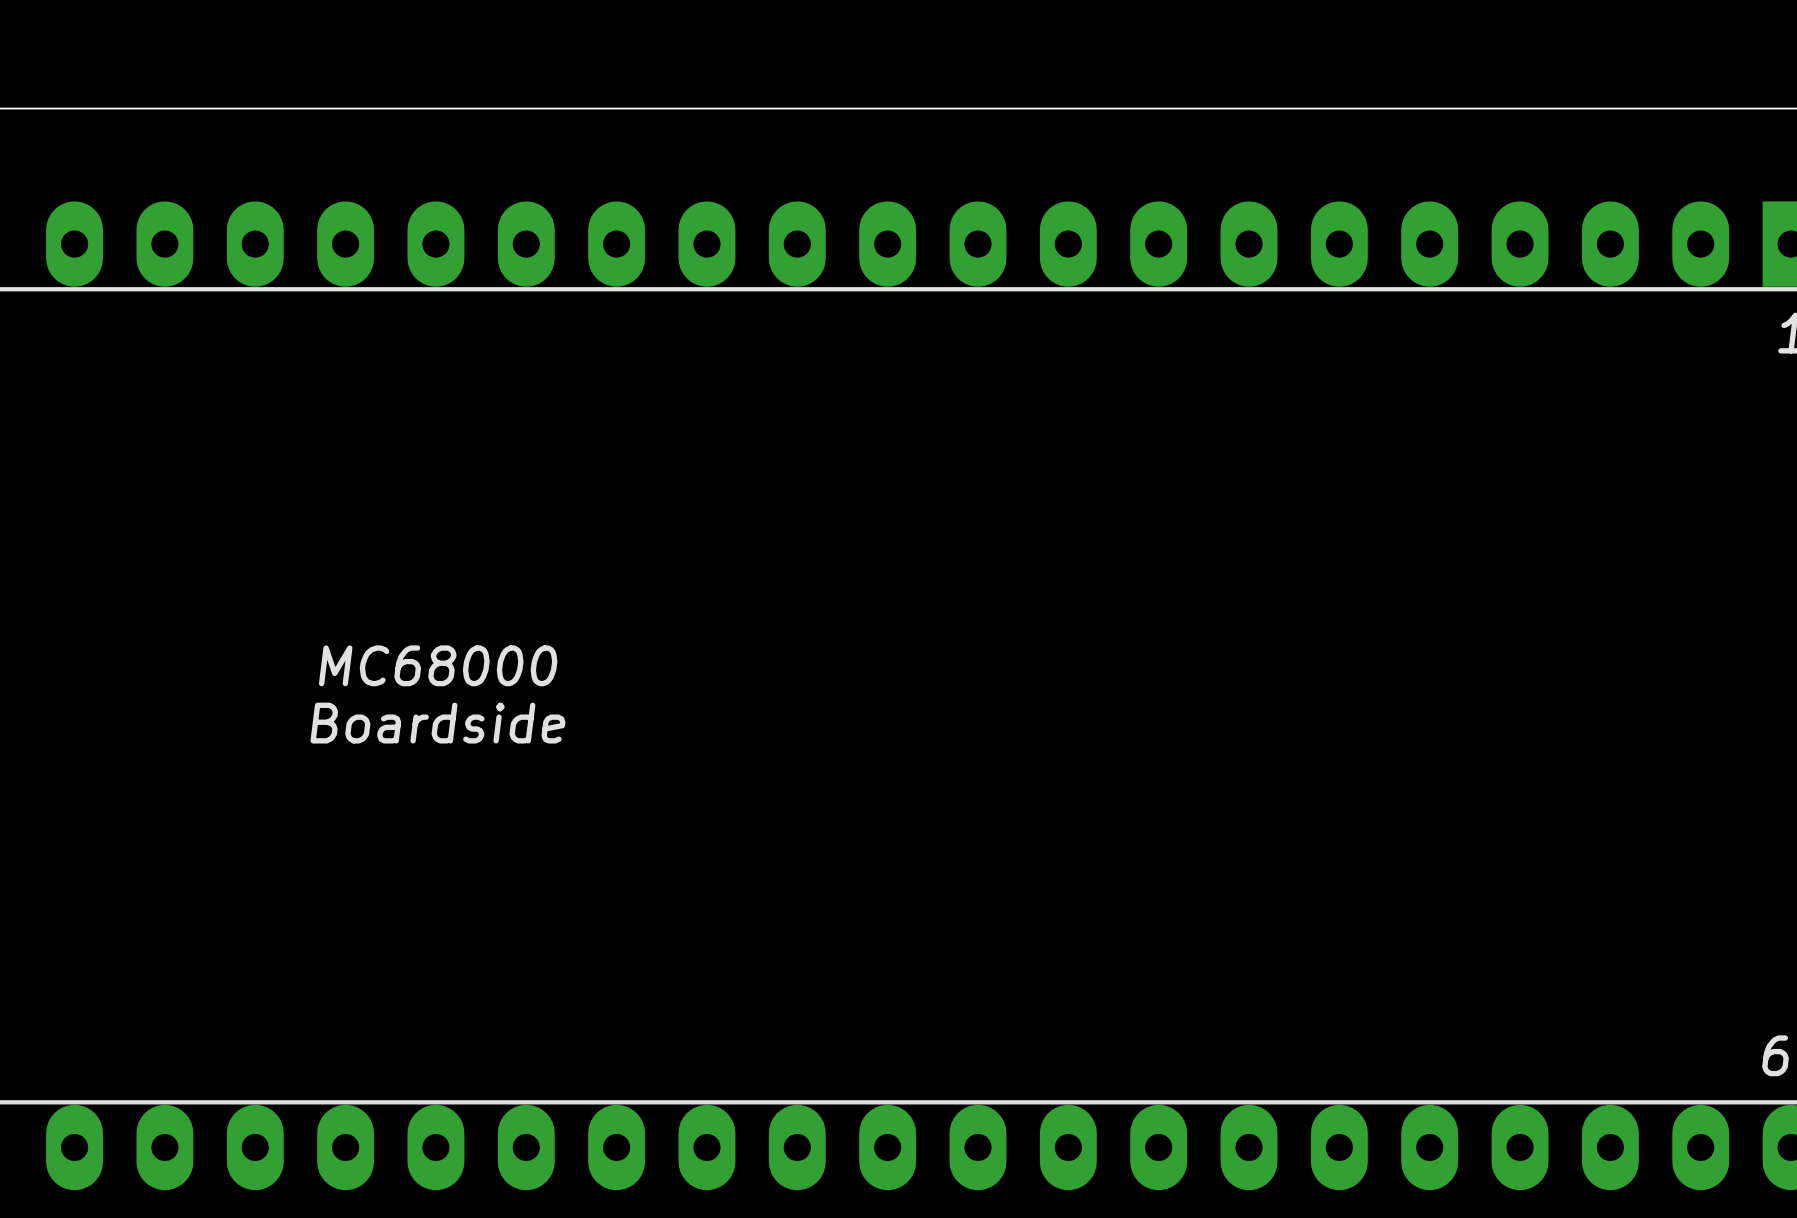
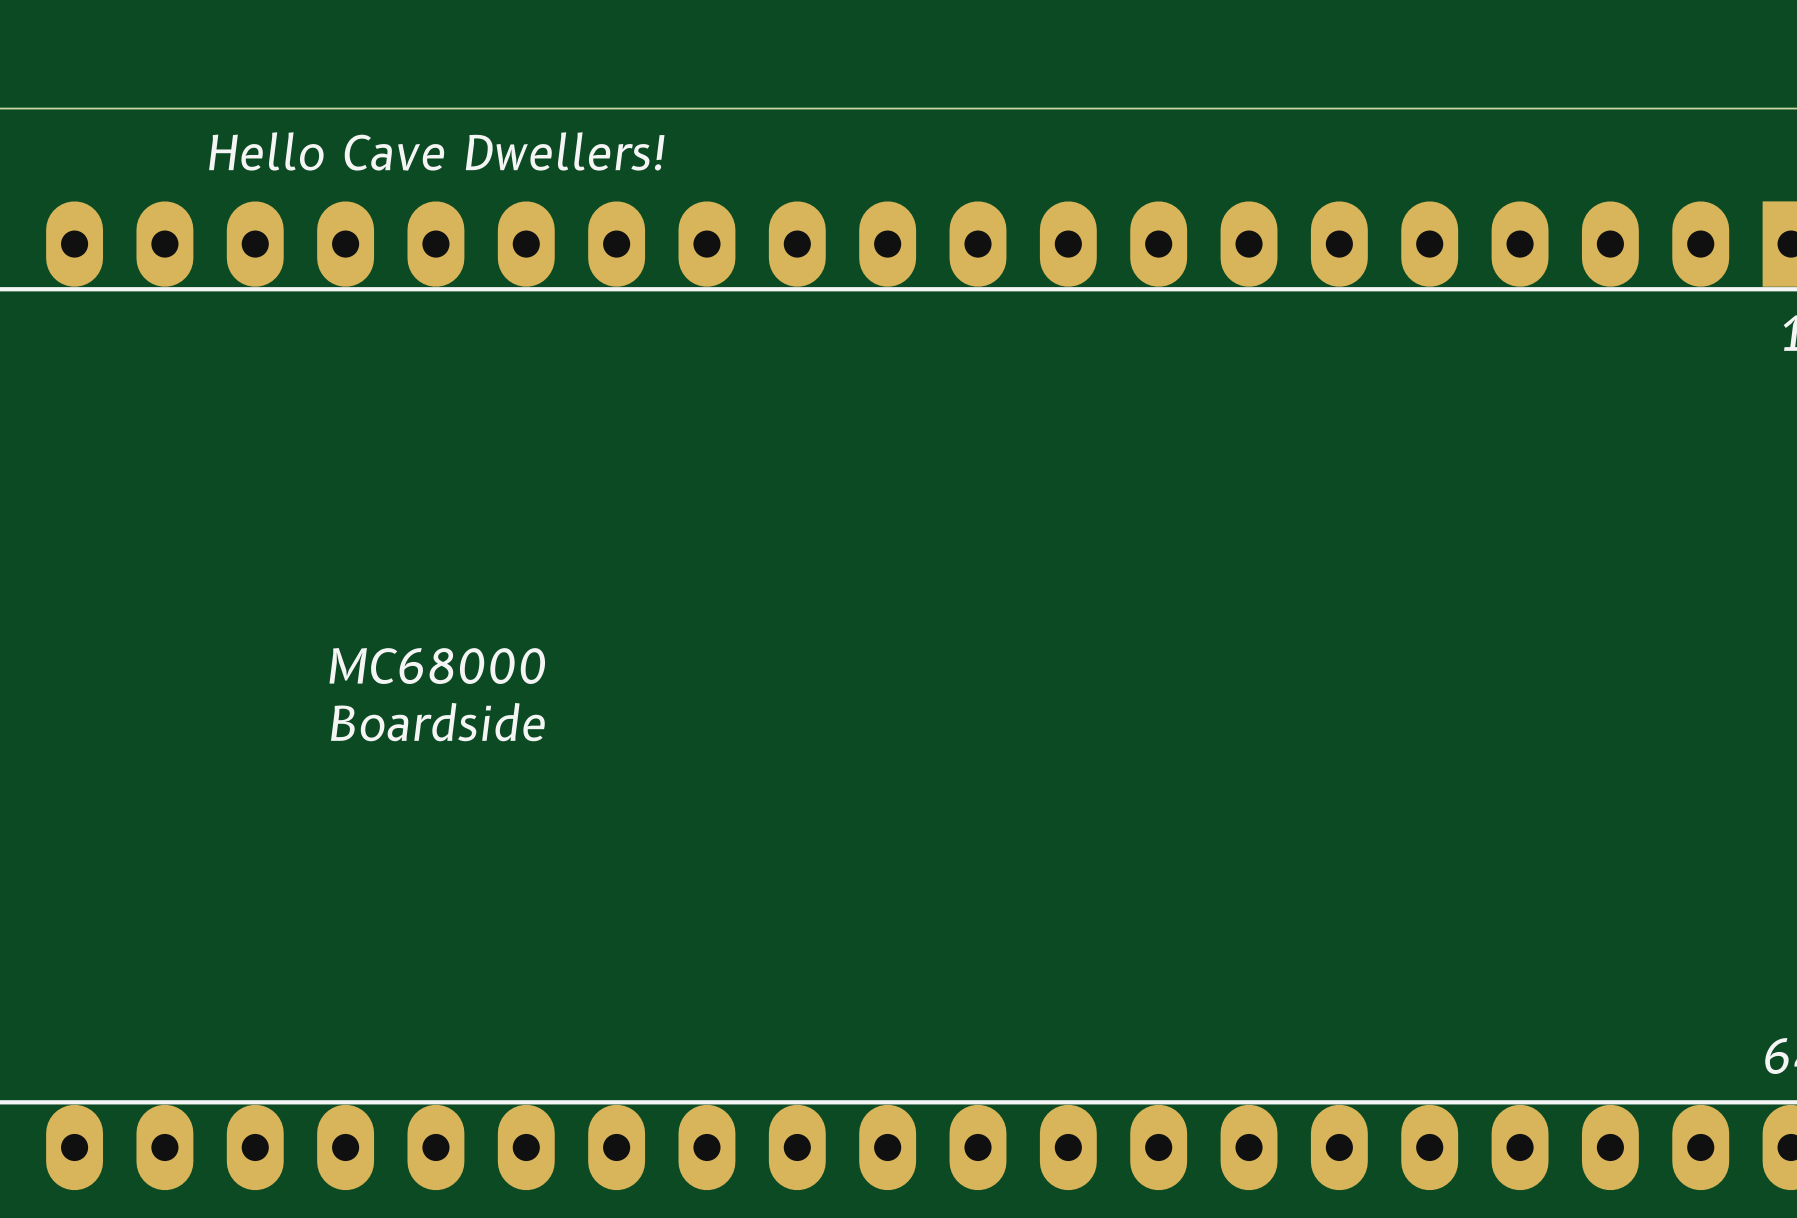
text: none -> Hello Cave Dwellers! (436, 151)

